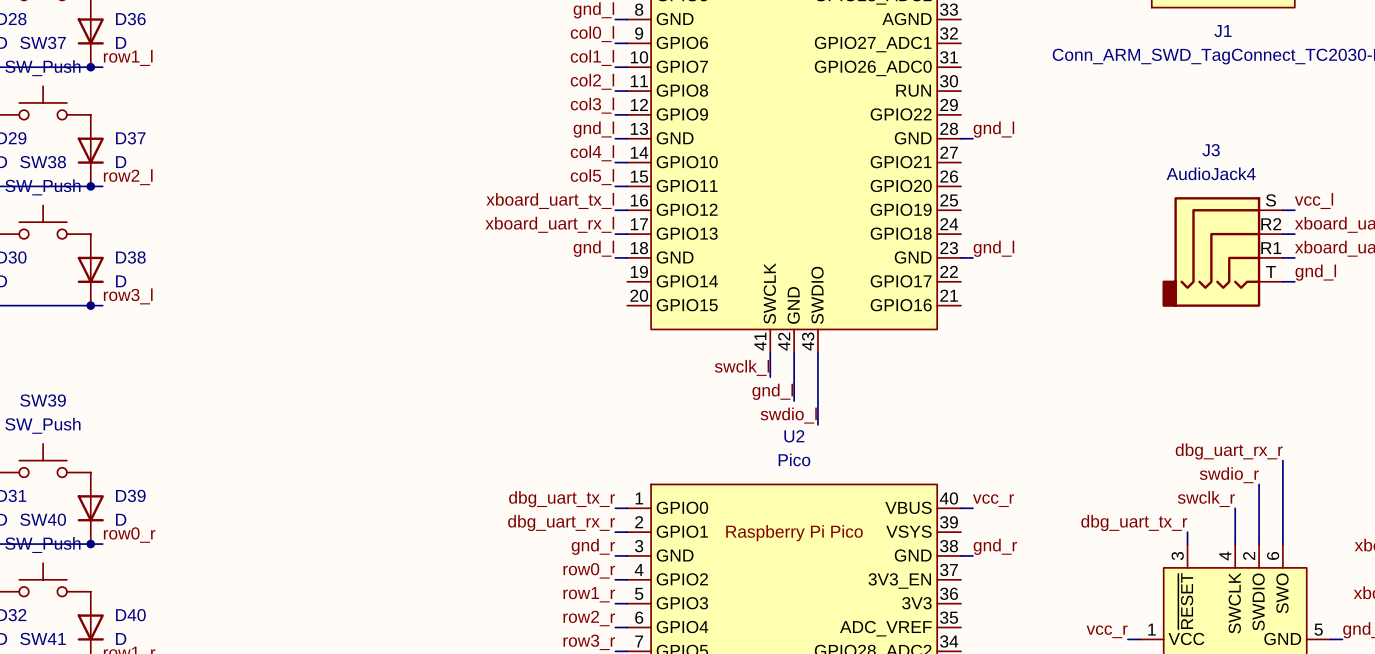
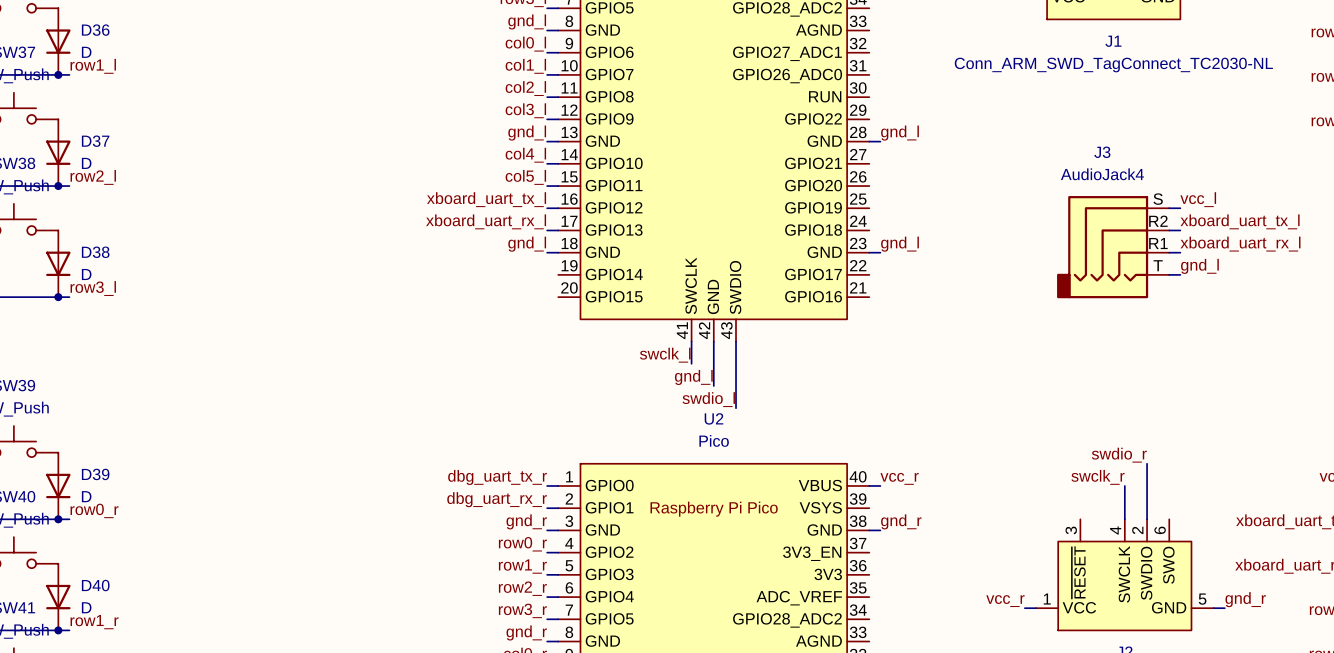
label: dbg_uart_rx_r (1229, 451) -> none
wire: (1282, 460) (1282, 544) -> none
label: dbg_uart_tx_r (1134, 522) -> none
wire: (1187, 532) (1187, 544) -> none

